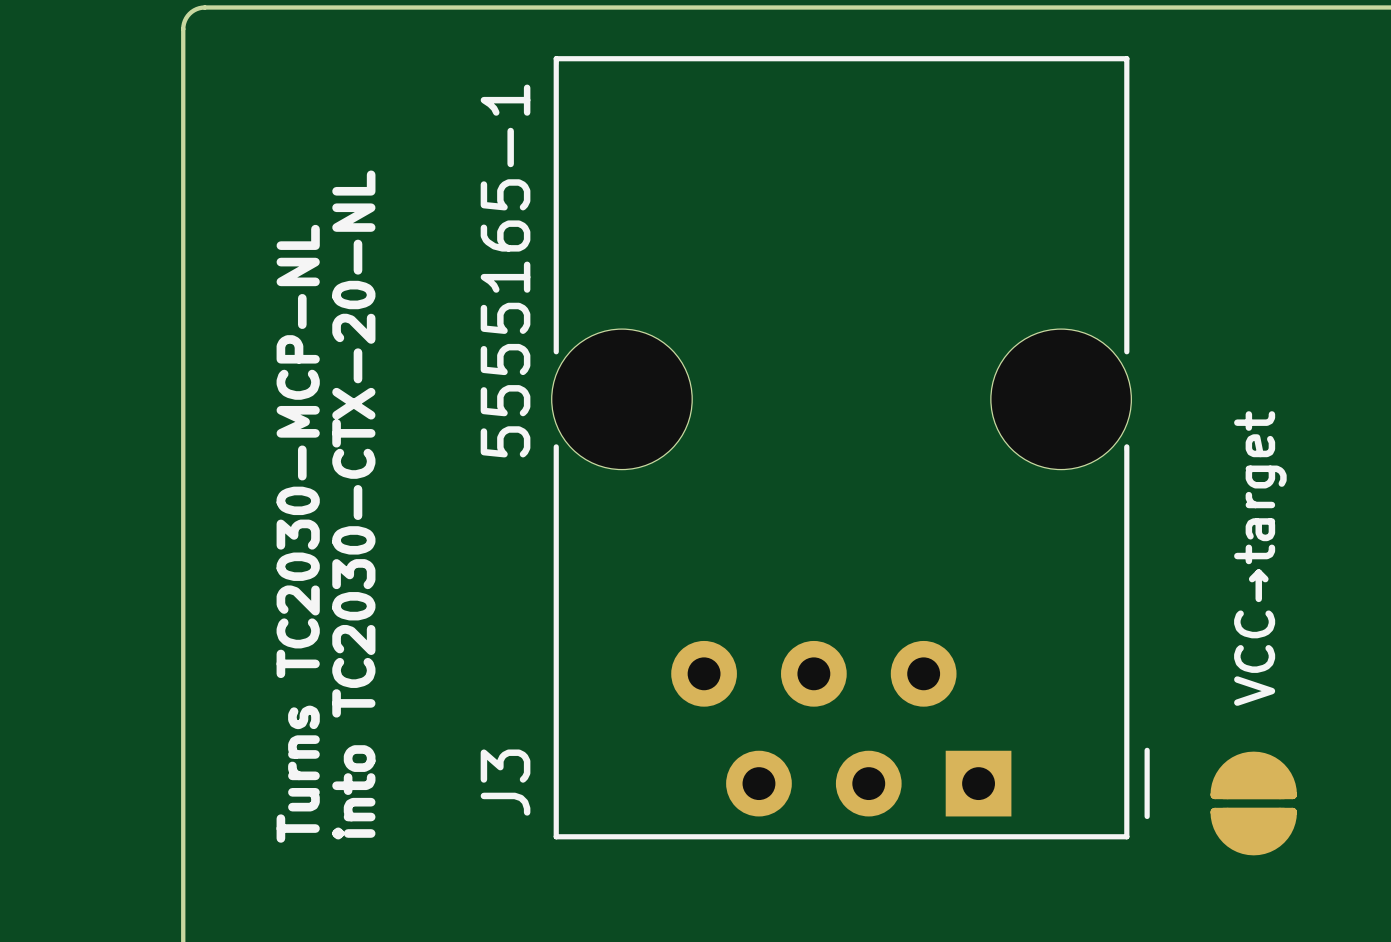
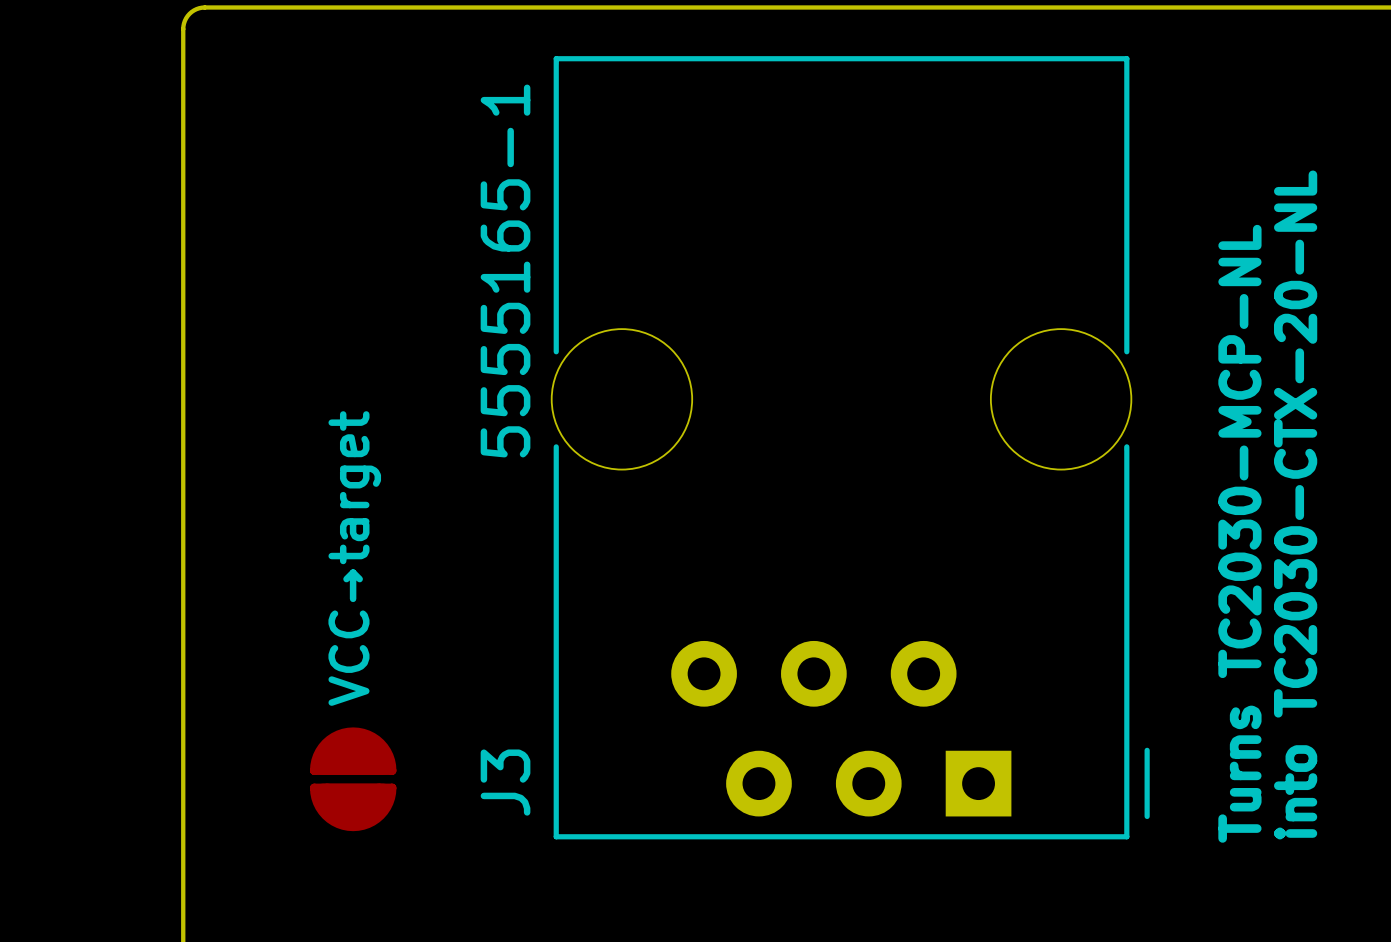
text position: into TC2030-CTX-20-NL (353, 504) -> into TC2030-CTX-20-NL (1295, 504)
text position: Turns TC2030-MCP-NL (298, 533) -> Turns TC2030-MCP-NL (1239, 533)
text position: VCC→target (1260, 558) -> VCC→target (354, 558)
part position: (1253, 803) -> (353, 779)

